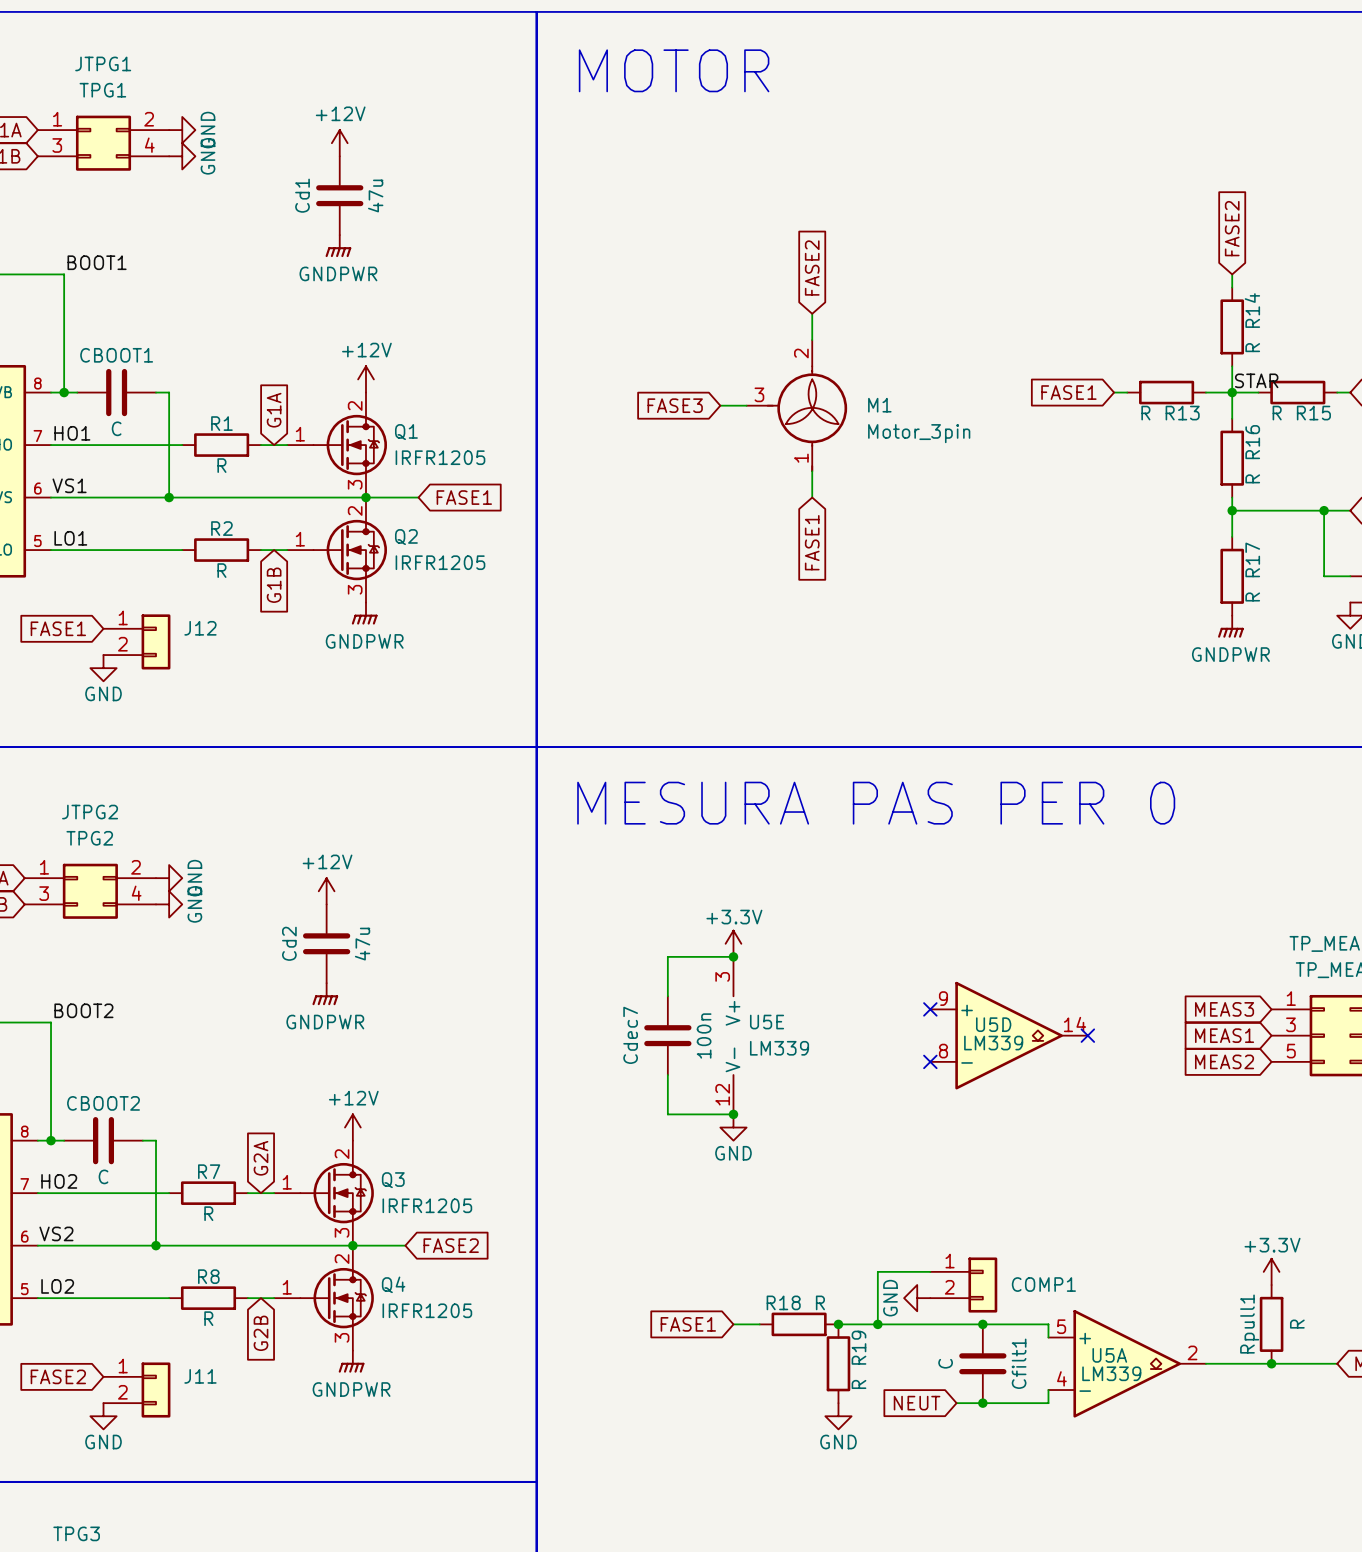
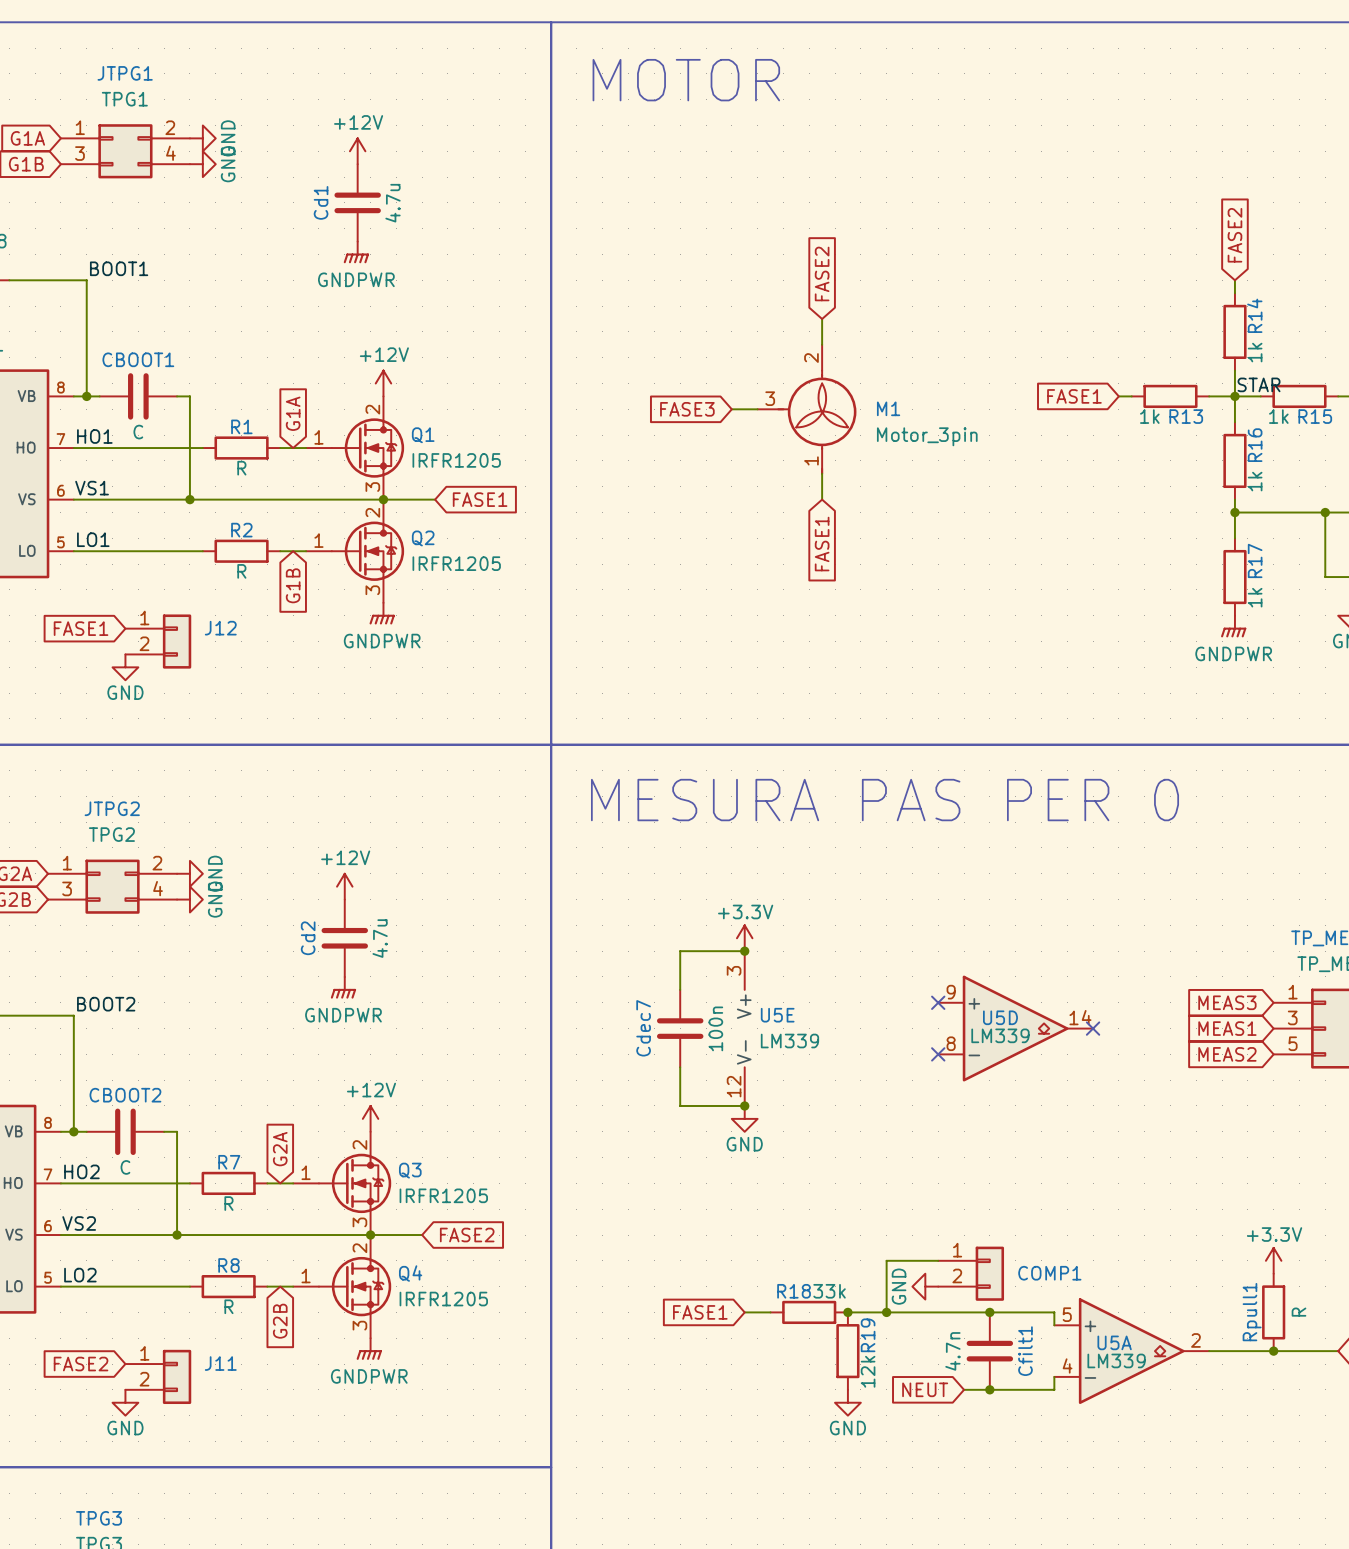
Cd1 value: 47u (375, 196) -> 4.7u (393, 203)
R14 value: R (1252, 347) -> 1k (1255, 352)
R13 value: R (1145, 413) -> 1k (1149, 416)
R15 value: R (1277, 413) -> 1k (1278, 416)
R16 value: R (1252, 478) -> 1k (1255, 481)
R17 value: R (1252, 596) -> 1k (1255, 597)
Cd2 value: 47u (362, 944) -> 4.7u (380, 938)
R18 value: R (820, 1302) -> 33k (829, 1291)
Cfilt1 value: C (945, 1363) -> 4.7n (952, 1351)
R19 value: R (858, 1384) -> 12k (868, 1371)

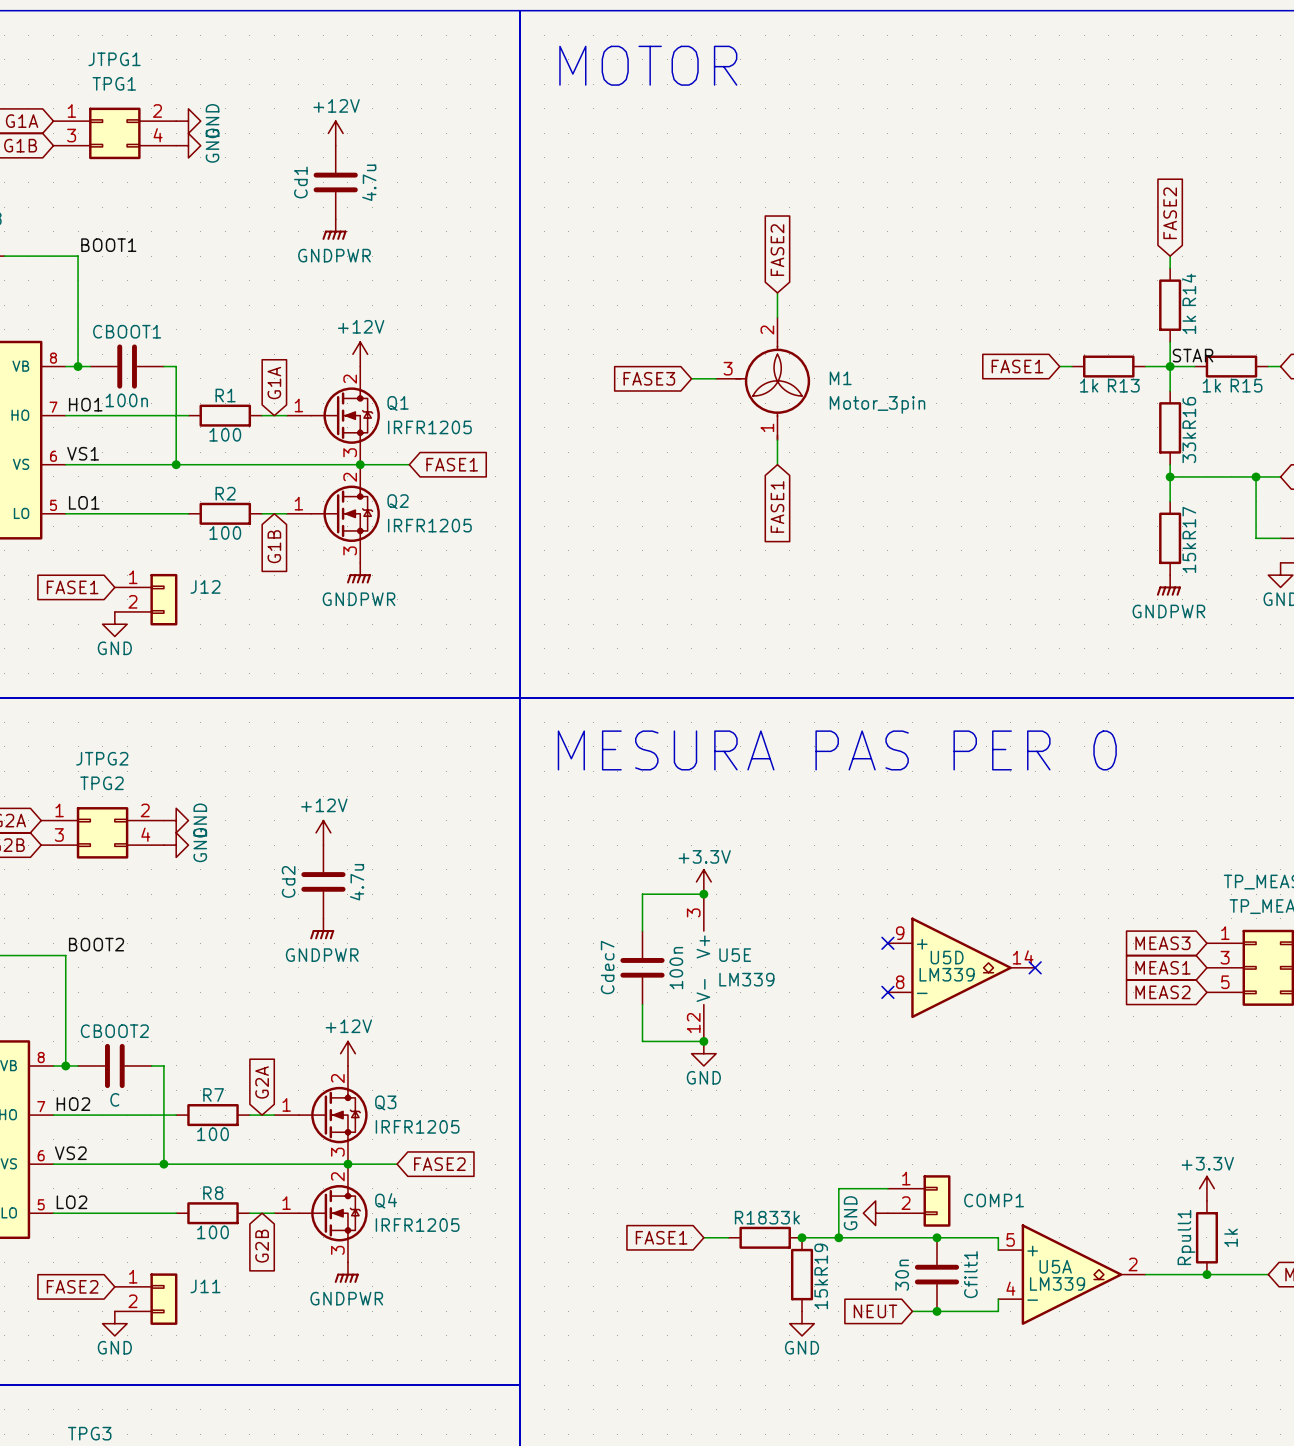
CBOOT1 value: C (138, 432) -> 100n (126, 400)
R1 value: R (241, 468) -> 100 (225, 434)
R16 value: 1k (1255, 481) -> 33k (1189, 447)
R2 value: R (241, 571) -> 100 (225, 532)
R17 value: 1k (1255, 597) -> 15k (1189, 557)
R7 value: R (228, 1203) -> 100 (213, 1134)
R8 value: R (228, 1306) -> 100 (213, 1232)
Rpull1 value: R (1298, 1312) -> 1k (1231, 1237)
Cfilt1 value: 4.7n (952, 1351) -> 30n (902, 1275)
R19 value: 12k (868, 1371) -> 15k (821, 1294)

